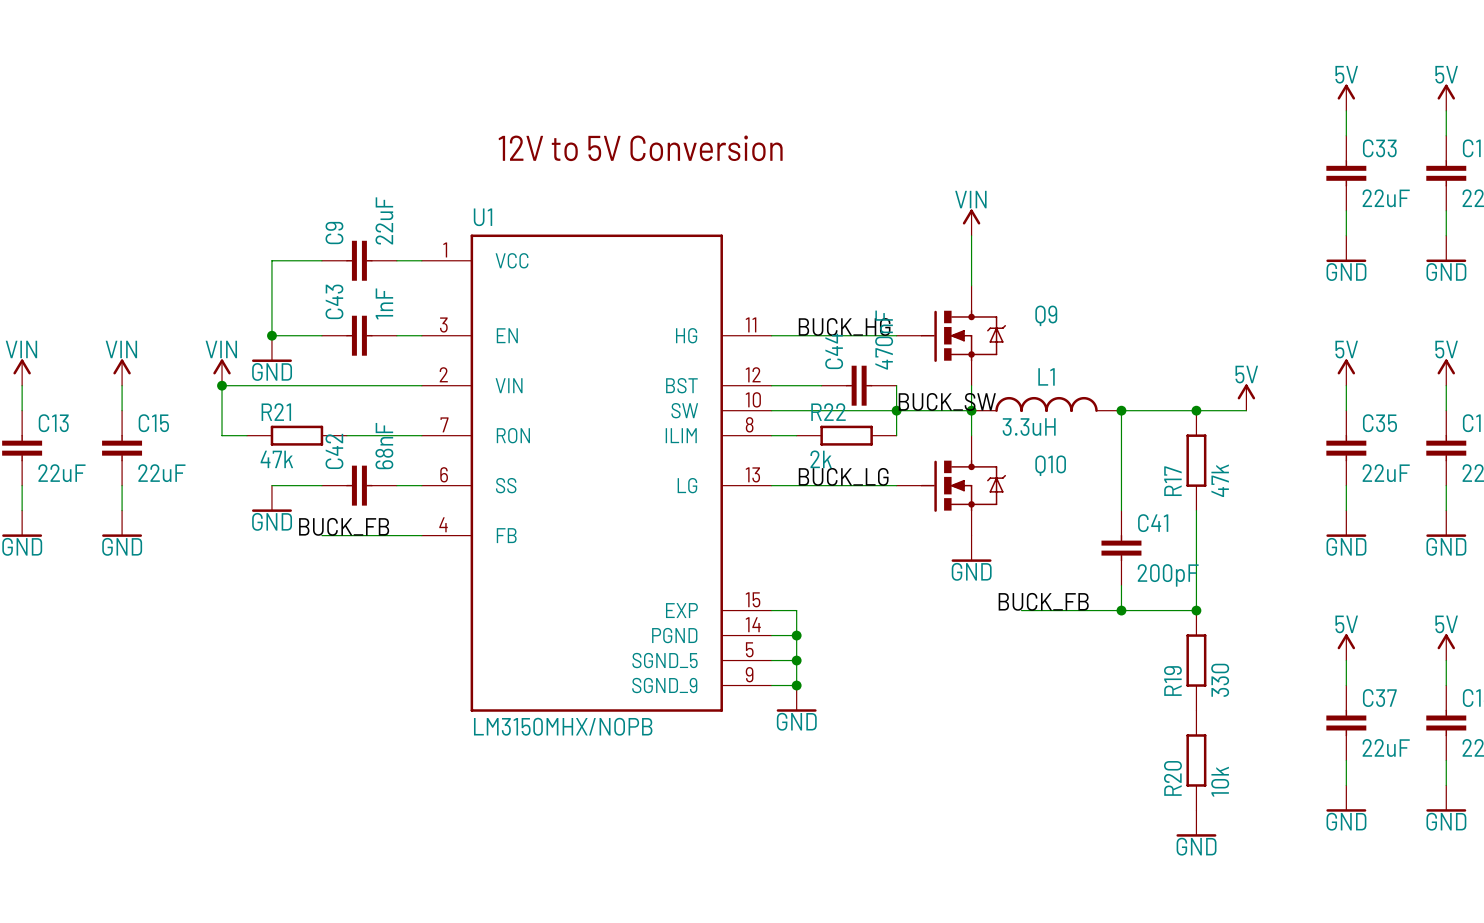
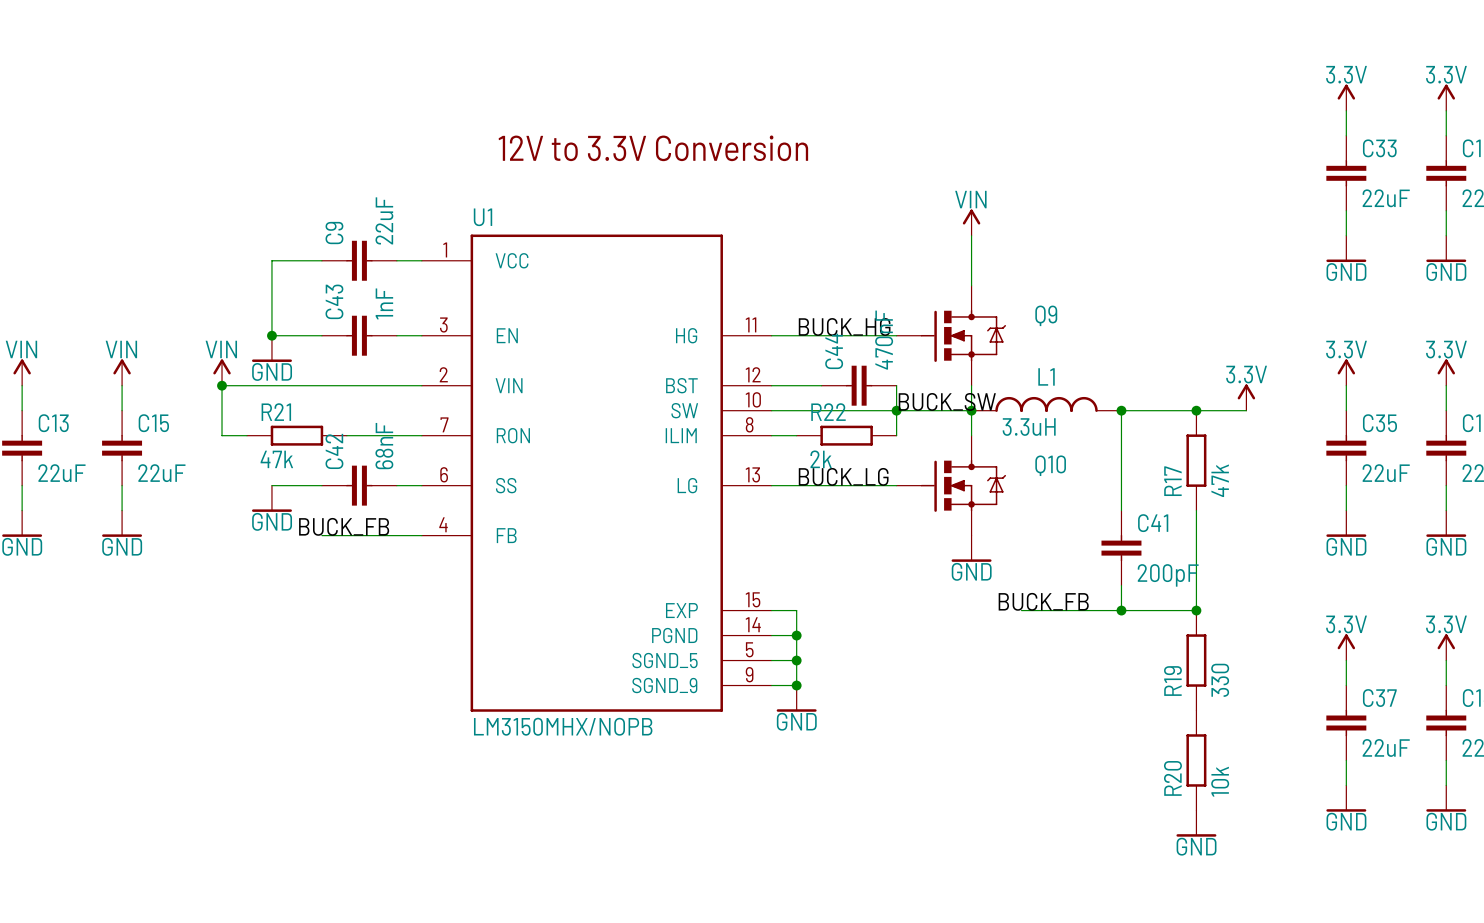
power symbol: 5V (1346, 97) -> 3.3V (1346, 97)
power symbol: 5V (1446, 97) -> 3.3V (1446, 97)
text: 12V to 5V Conversion (640, 148) -> 12V to 3.3V Conversion (653, 148)
power symbol: 5V (1346, 372) -> 3.3V (1346, 372)
power symbol: 5V (1446, 372) -> 3.3V (1446, 372)
power symbol: 5V (1246, 397) -> 3.3V (1246, 397)
power symbol: 5V (1346, 647) -> 3.3V (1346, 647)
power symbol: 5V (1446, 647) -> 3.3V (1446, 647)

